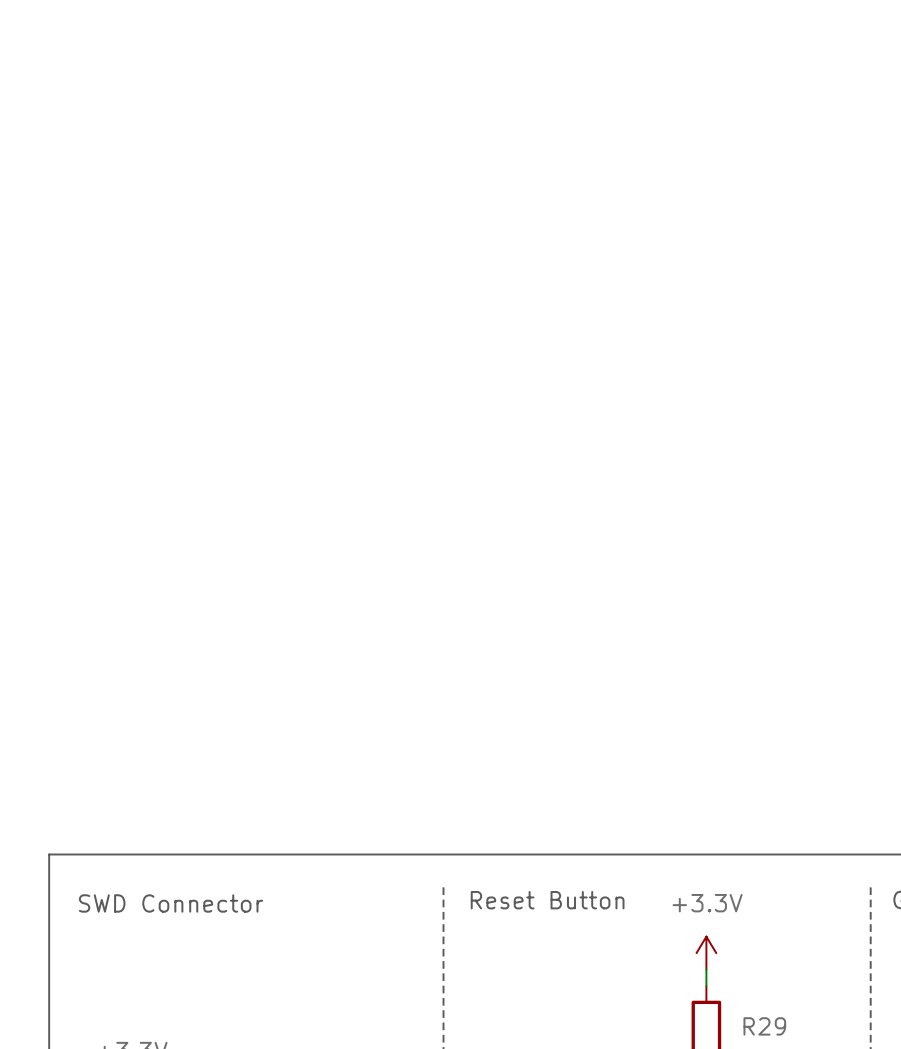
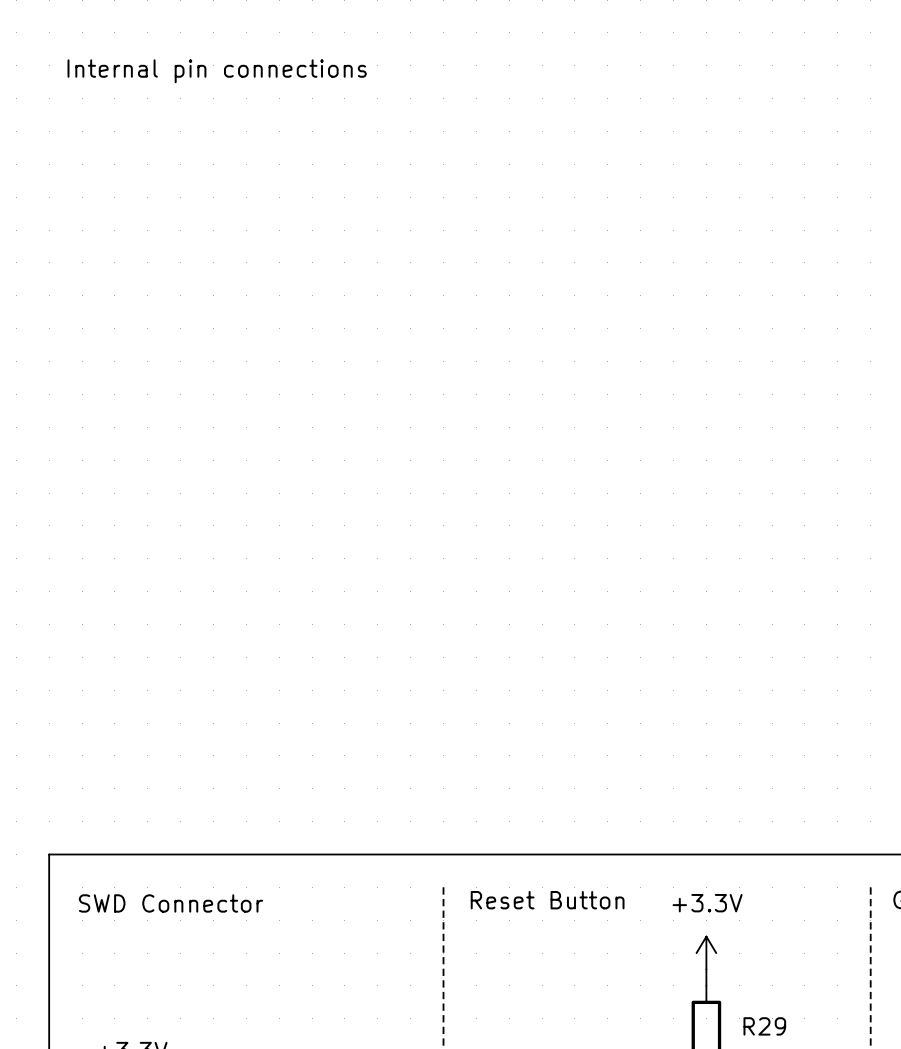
text: none -> Internal pin connections (217, 71)

